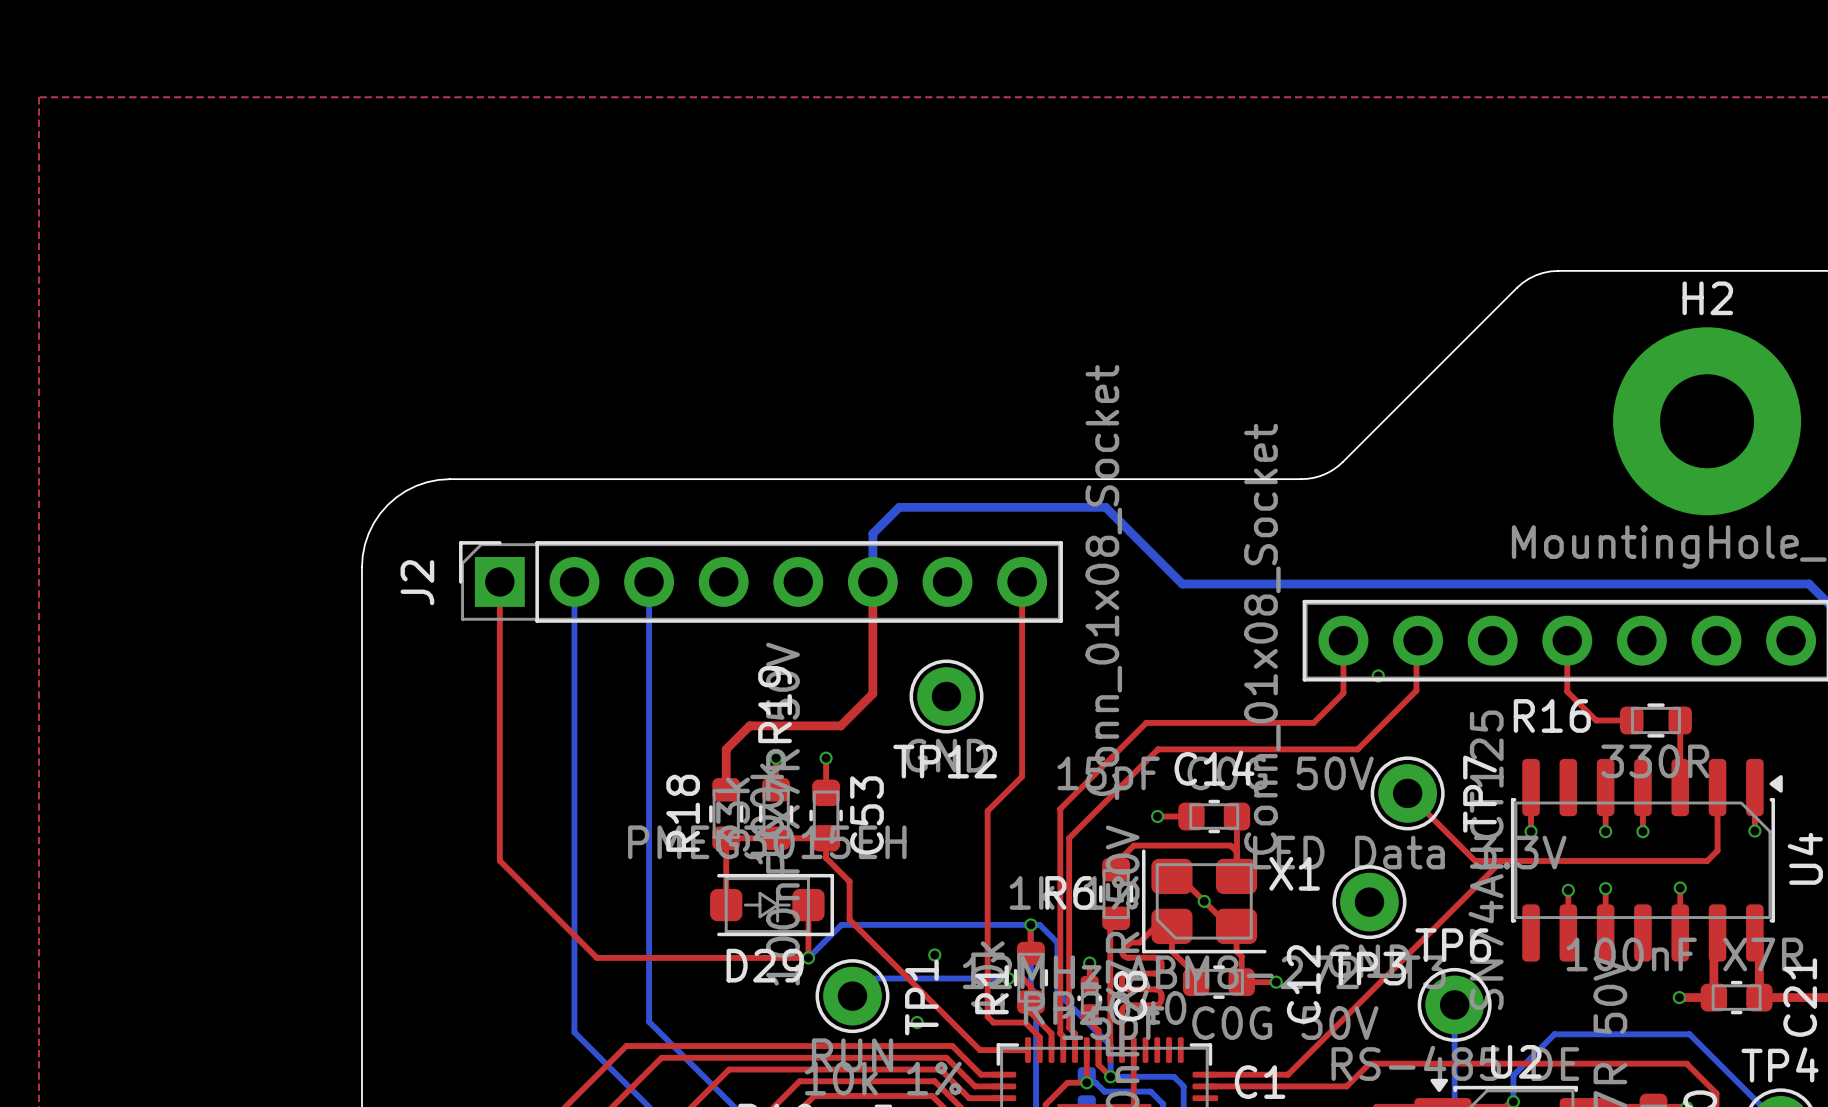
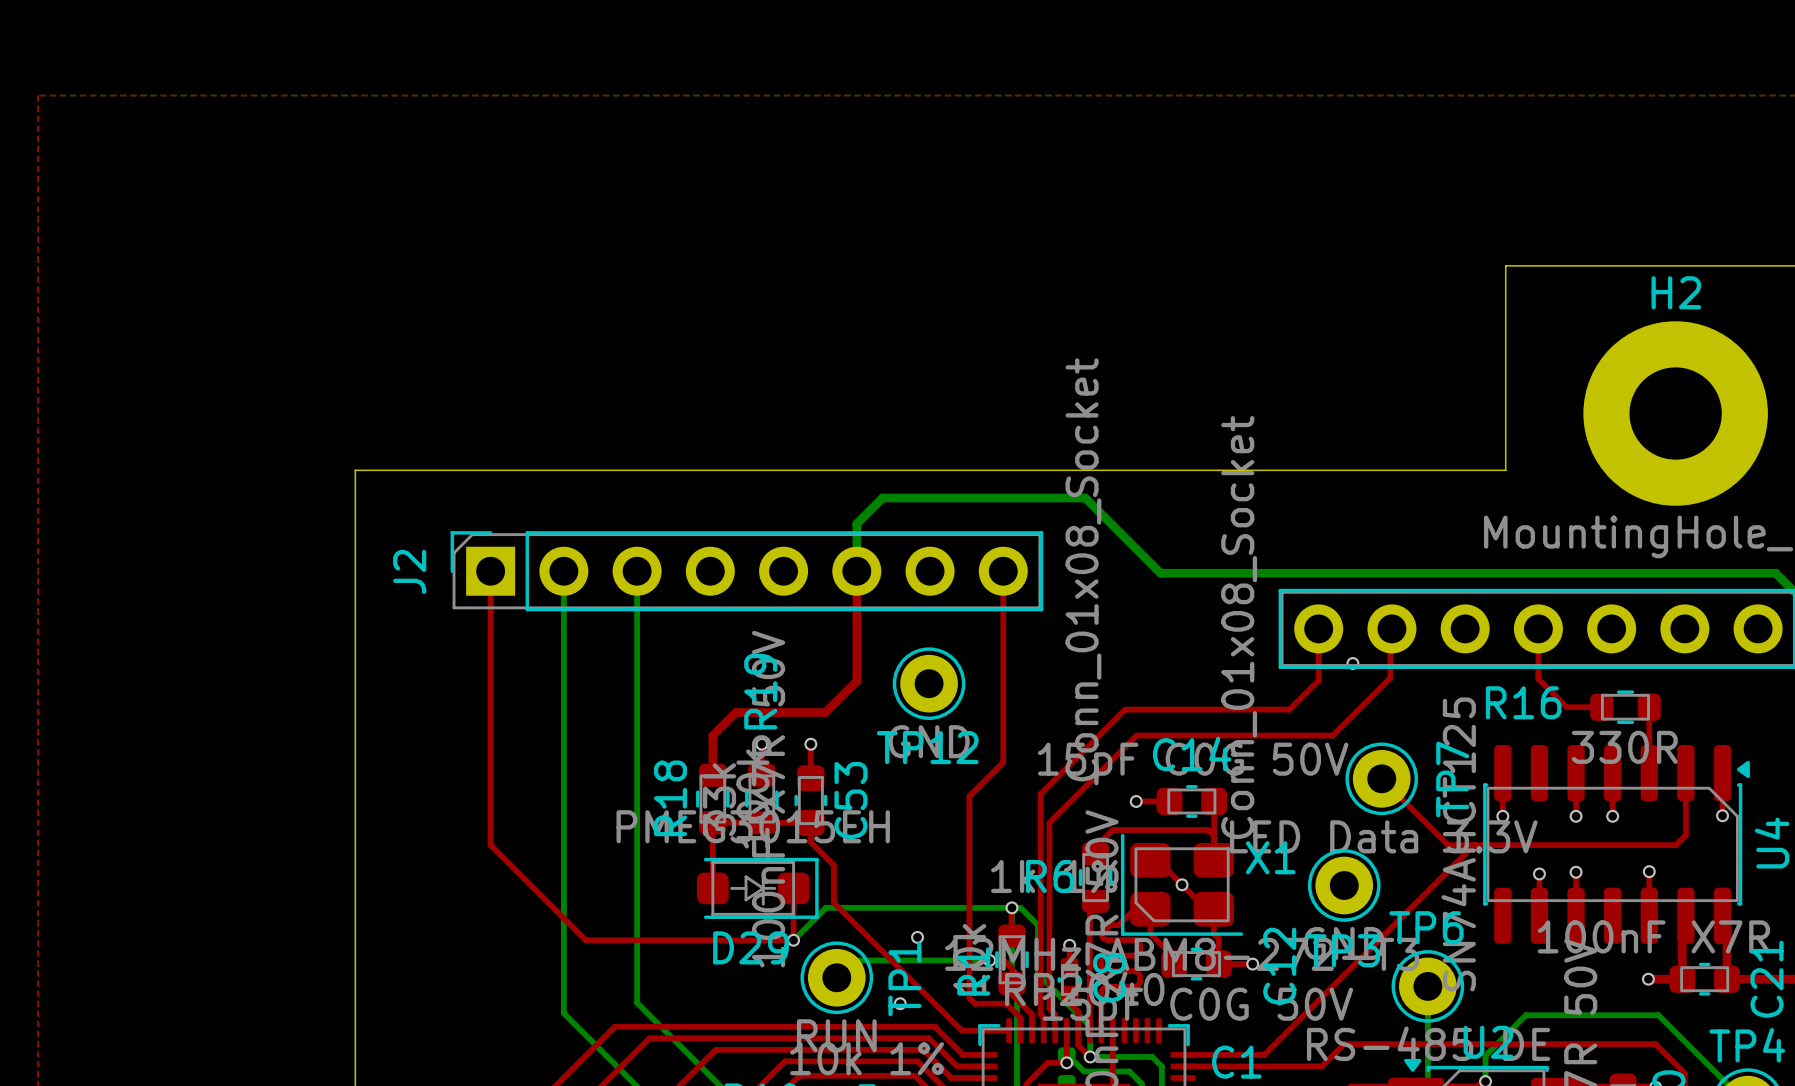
board edge: (1558, 270) (1535, 275) (1516, 288) (1338, 465) (1318, 476) (1301, 479) -> (1529, 265) (1505, 265) (1505, 470) (1277, 470)
board edge: (450, 479) (427, 482) (416, 485) (406, 490) (387, 504) (380, 513) (368, 533) (364, 544) (361, 567) -> (441, 470) (355, 470) (355, 556)

